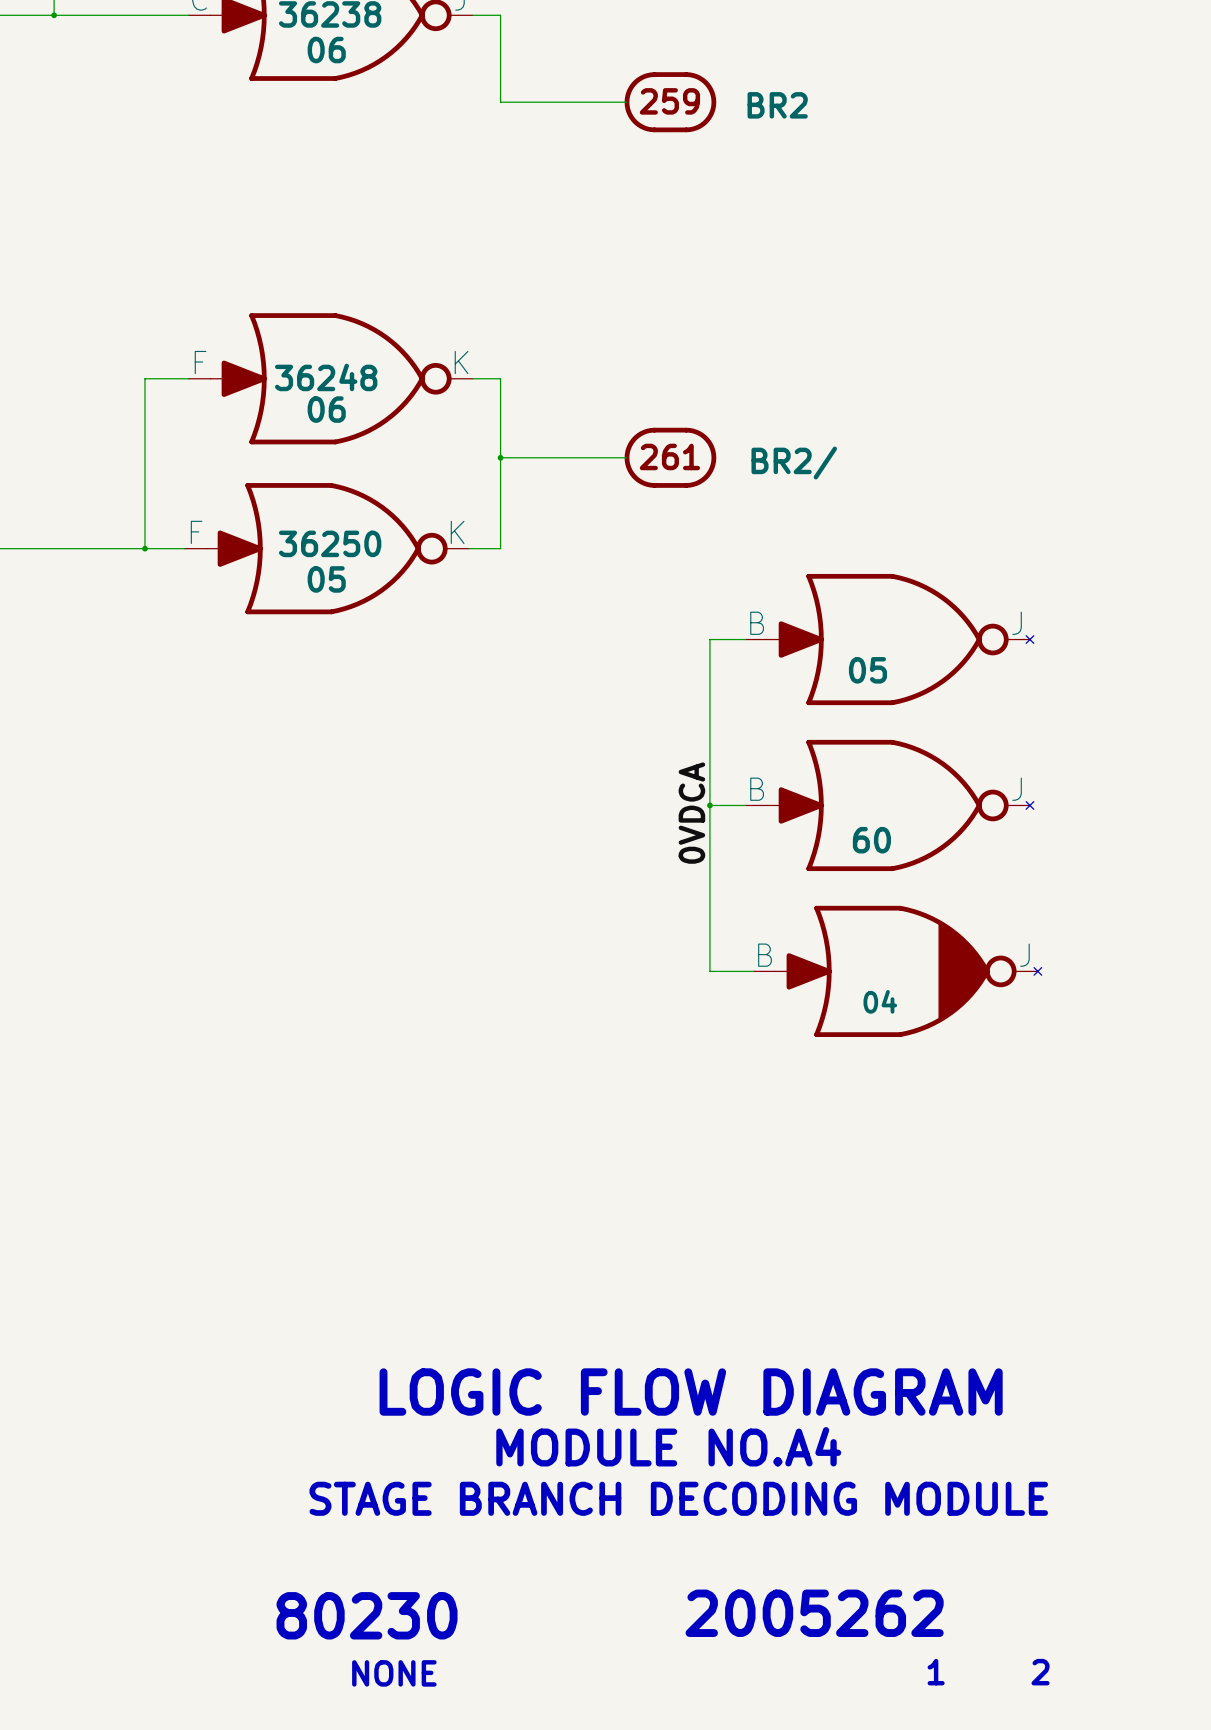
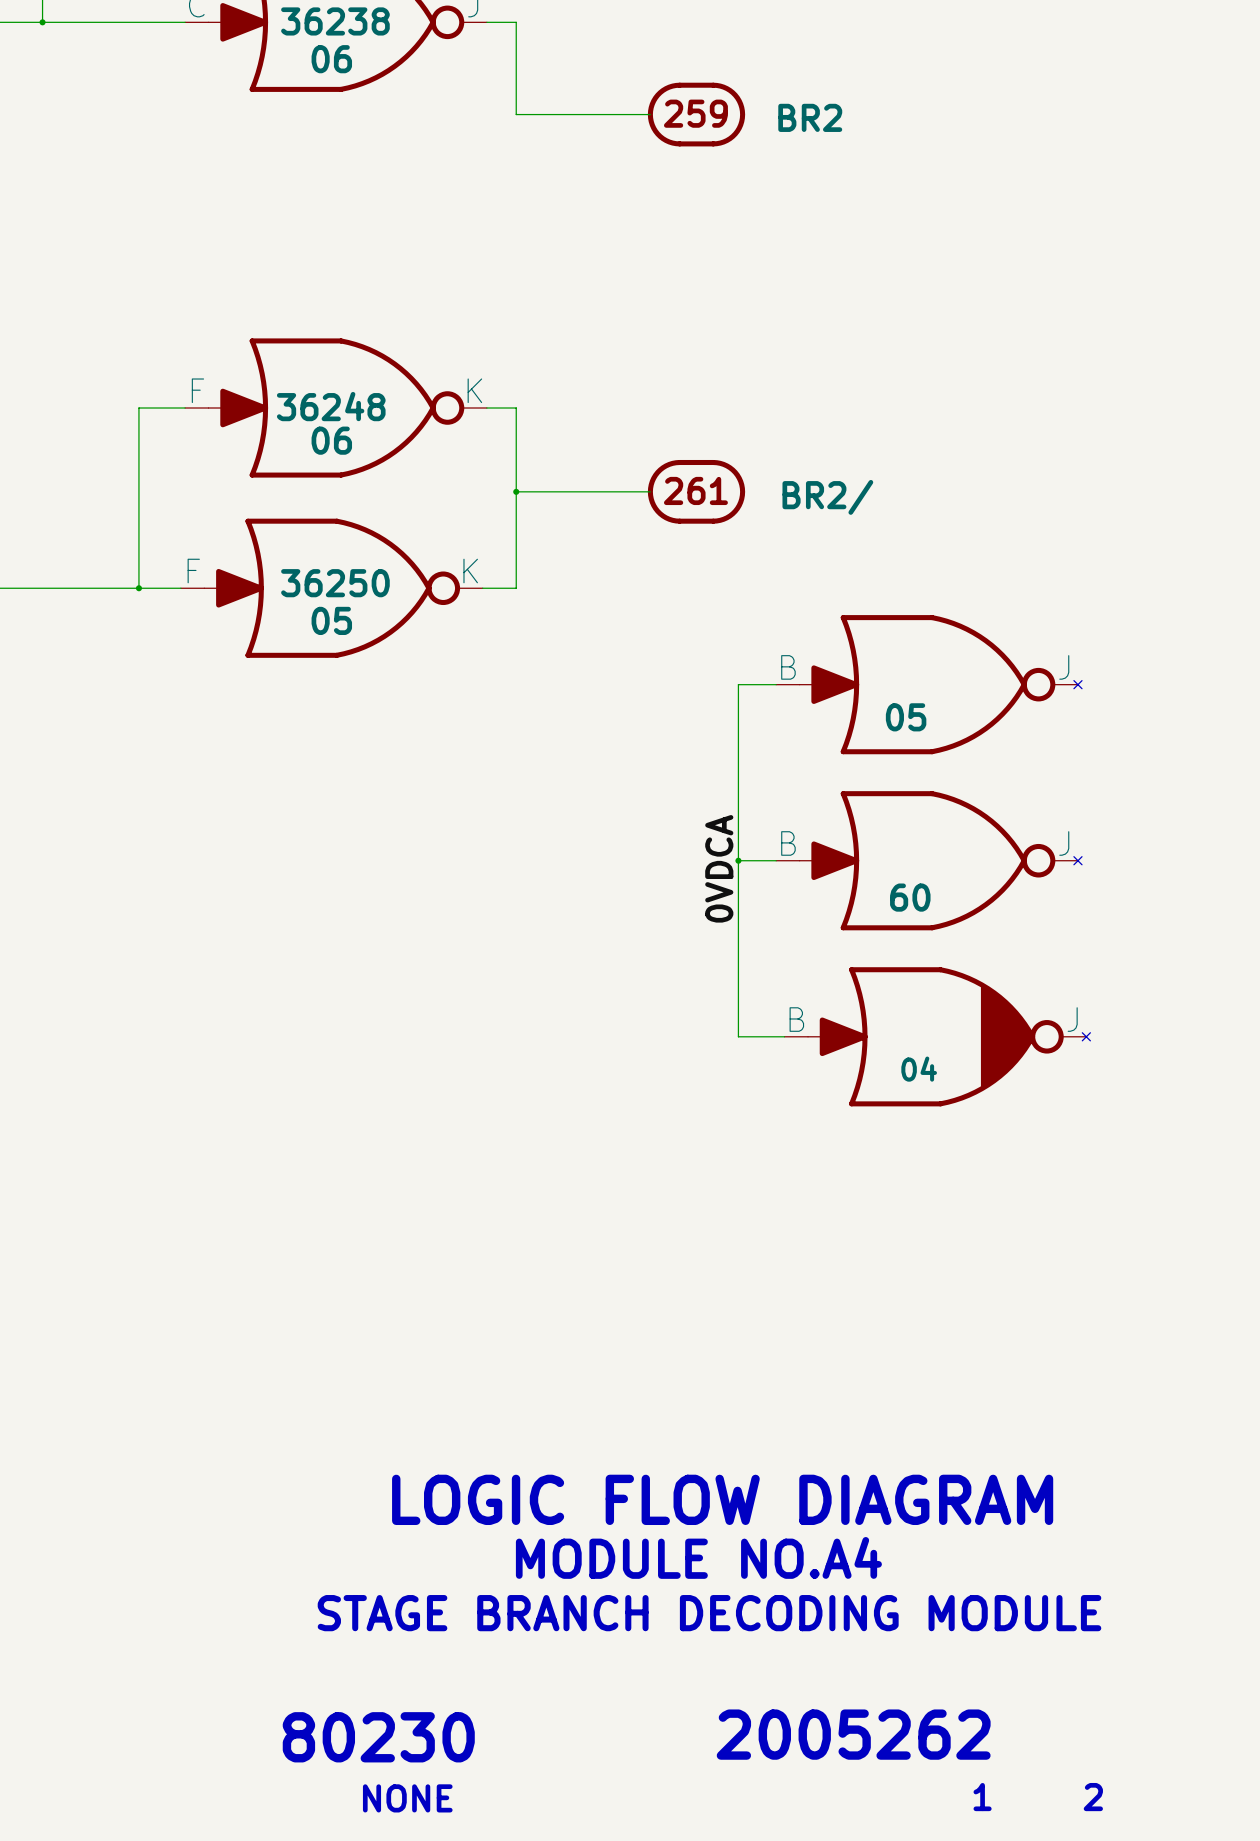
text position: LOGIC FLOW DIAGRAM (691, 1392) -> LOGIC FLOW DIAGRAM (722, 1499)
text position: MODULE NO.A4 (668, 1446) -> MODULE NO.A4 (698, 1557)
text position: STAGE BRANCH DECODING MODULE (678, 1498) -> STAGE BRANCH DECODING MODULE (709, 1613)
text position: 2005262 (814, 1613) -> 2005262 (853, 1734)
text position: 80230 (367, 1615) -> 80230 (378, 1737)
text position: 1 (936, 1672) -> 1 (982, 1797)
text position: 2 (1040, 1672) -> 2 (1093, 1797)
text position: NONE (394, 1673) -> NONE (407, 1798)

